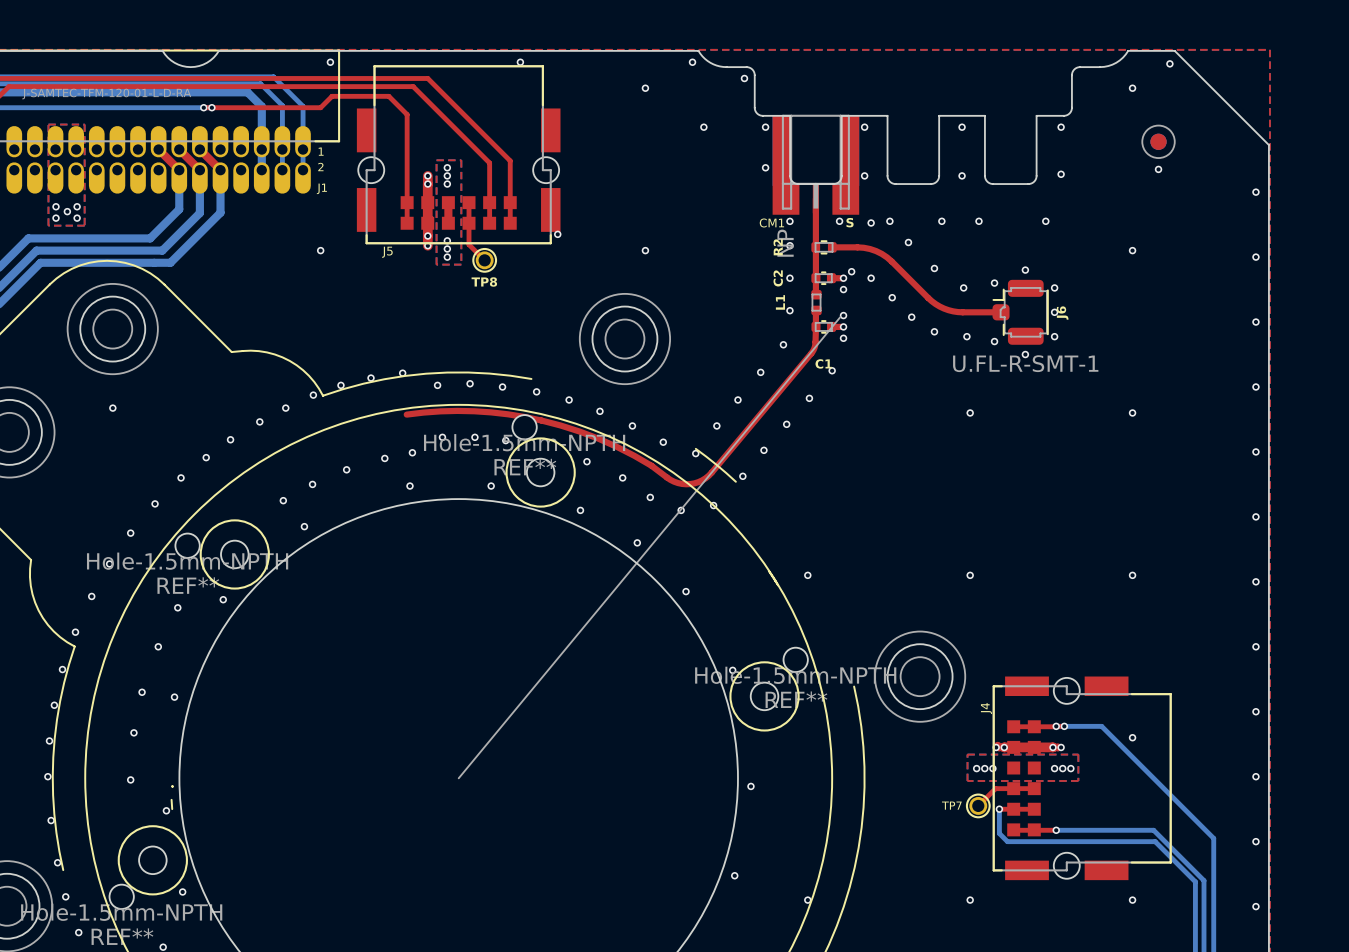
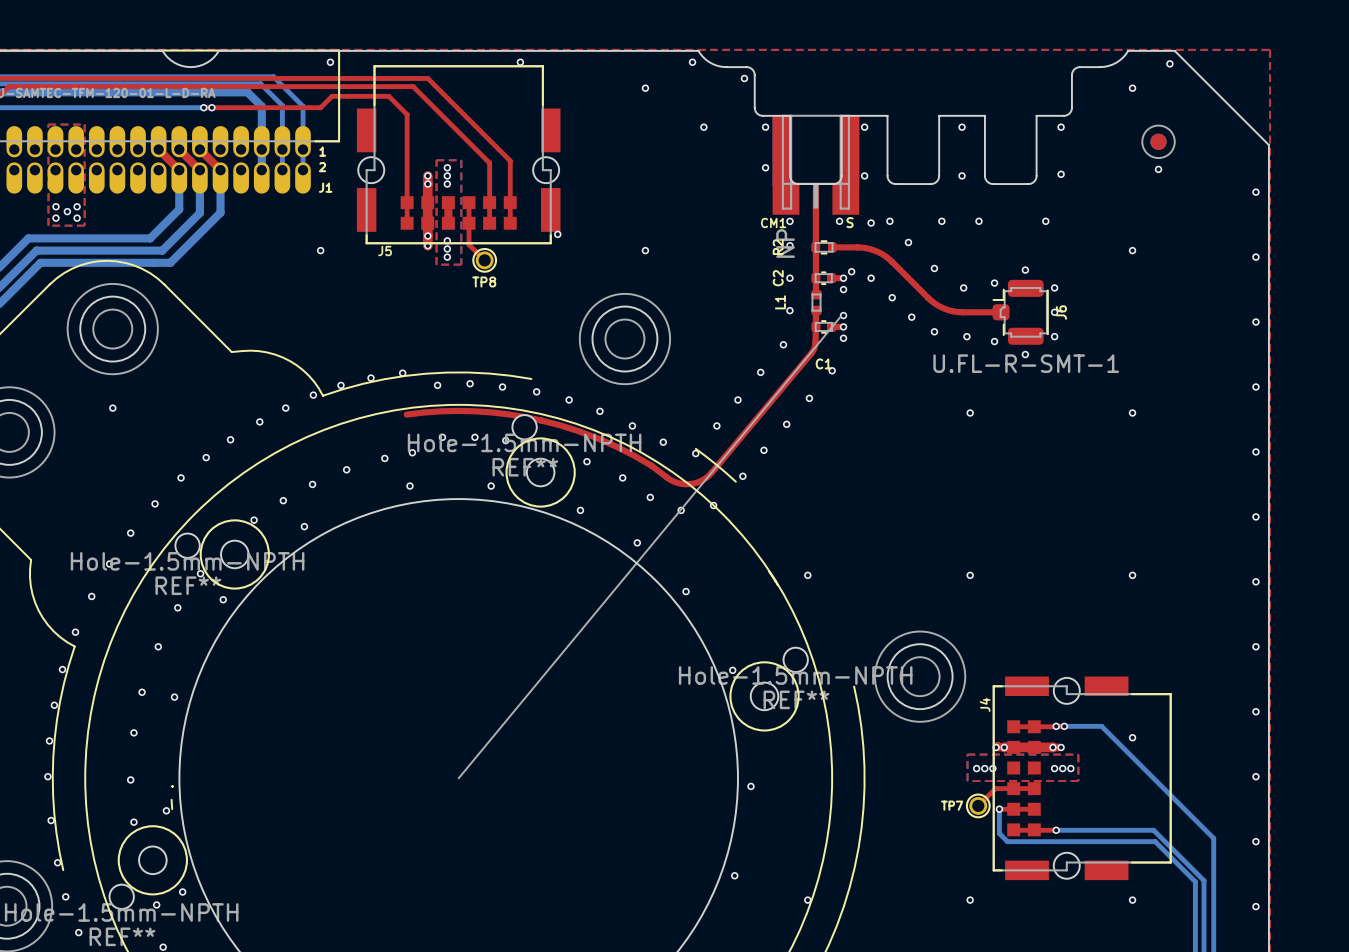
via: none -> (254, 520)
via: none -> (200, 573)
via: none -> (133, 822)
via: none -> (156, 904)

